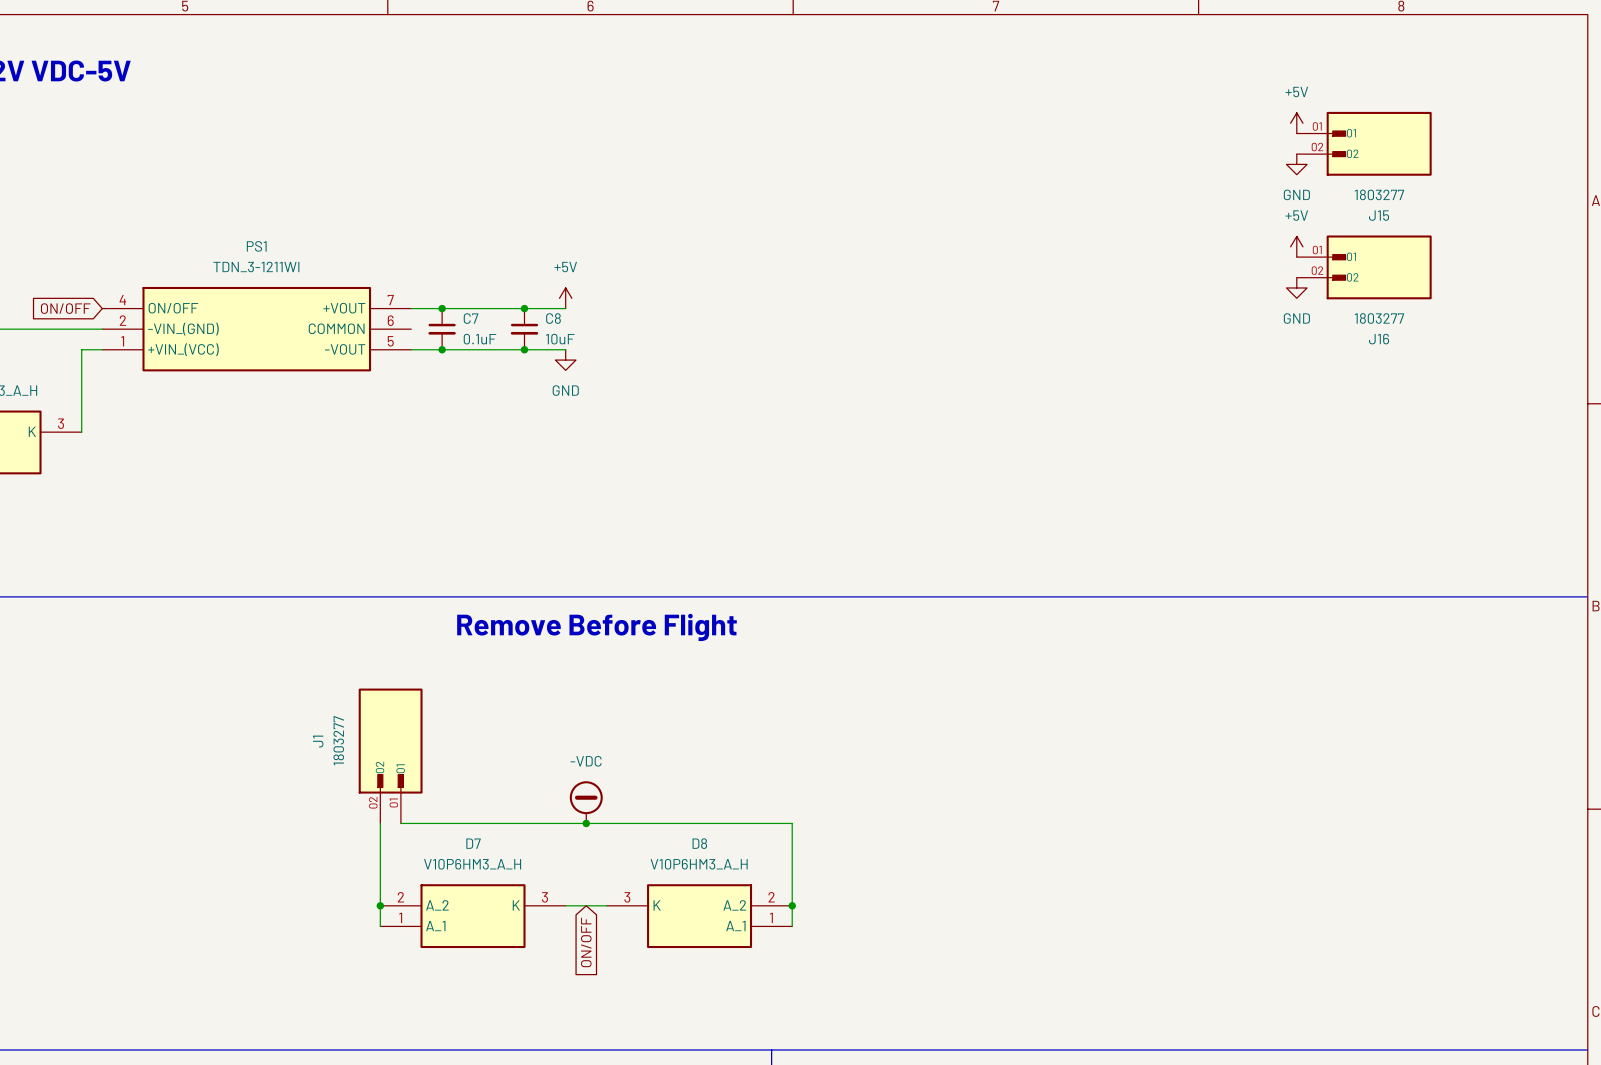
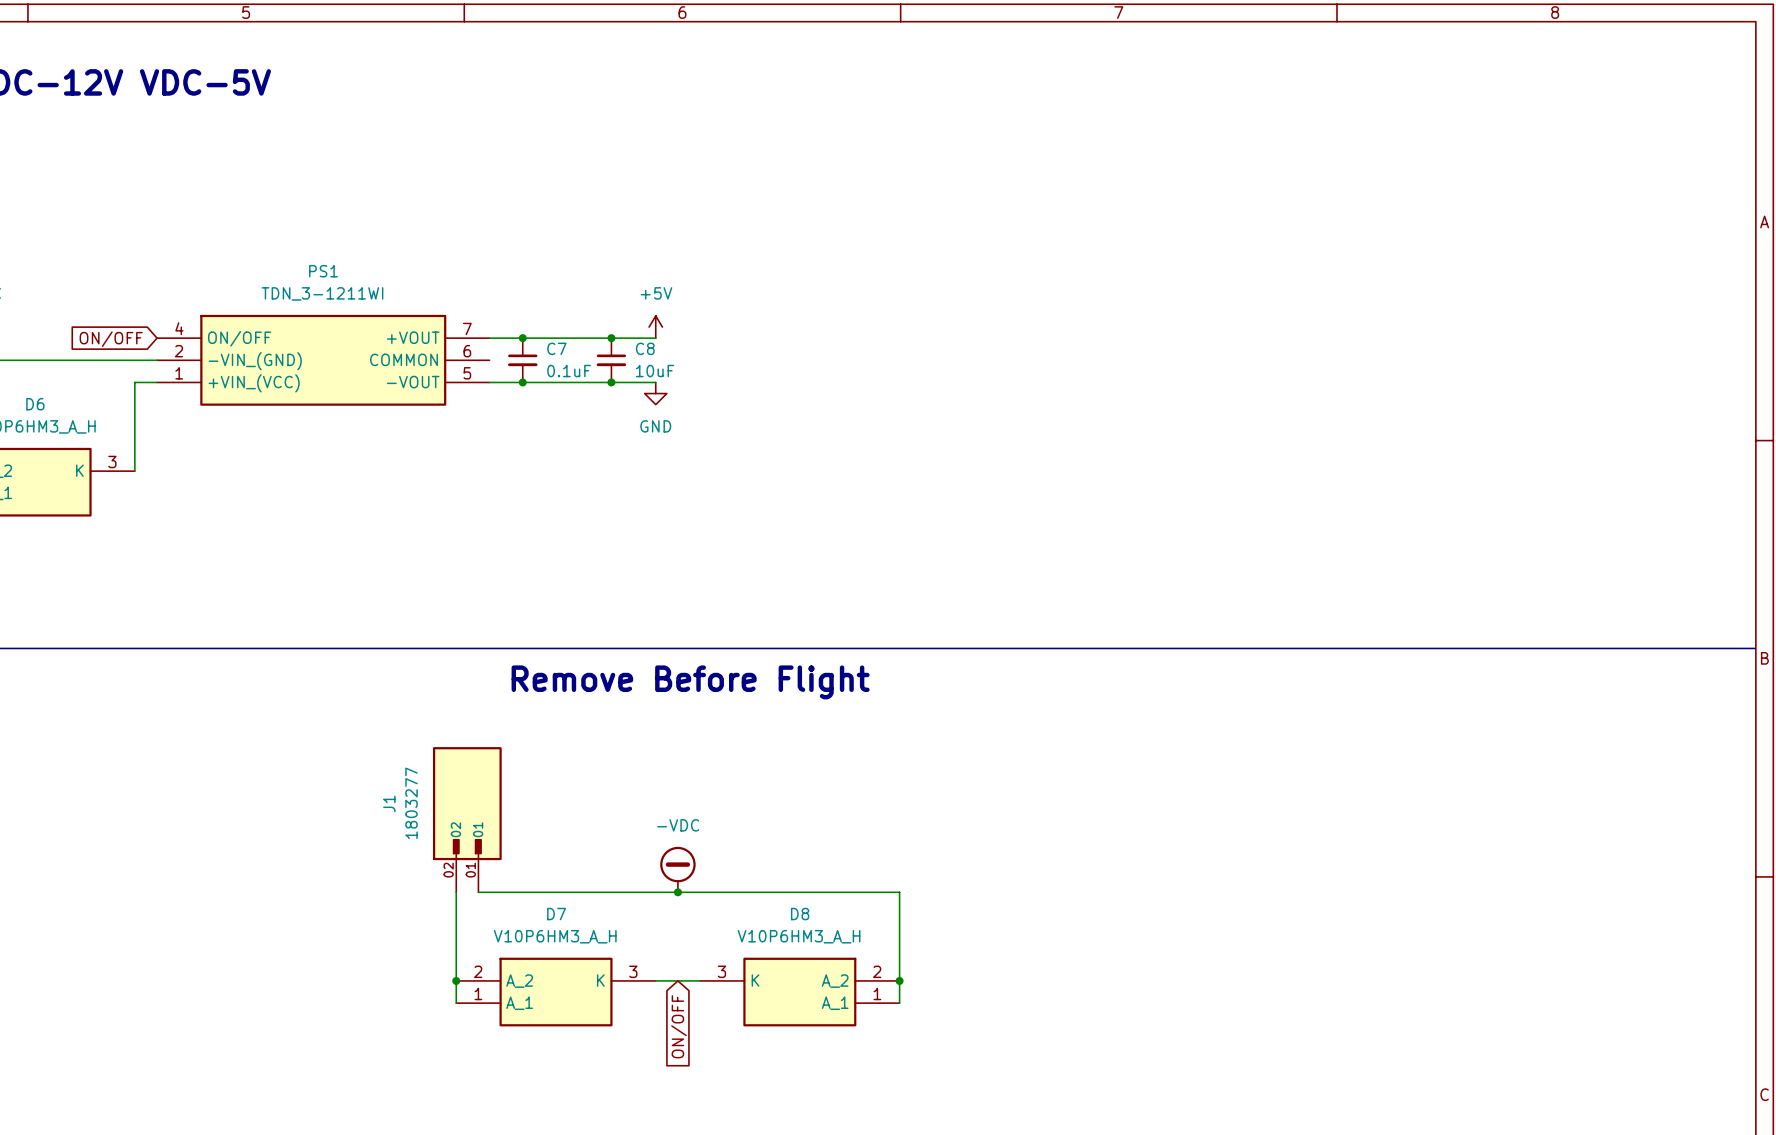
power symbol: +5V (1296, 123) -> none
J15: 1803277 (1364, 143) -> none
power symbol: GND (1296, 164) -> none
power symbol: +5V (1296, 246) -> none
J16: 1803277 (1364, 267) -> none
power symbol: GND (1296, 287) -> none

